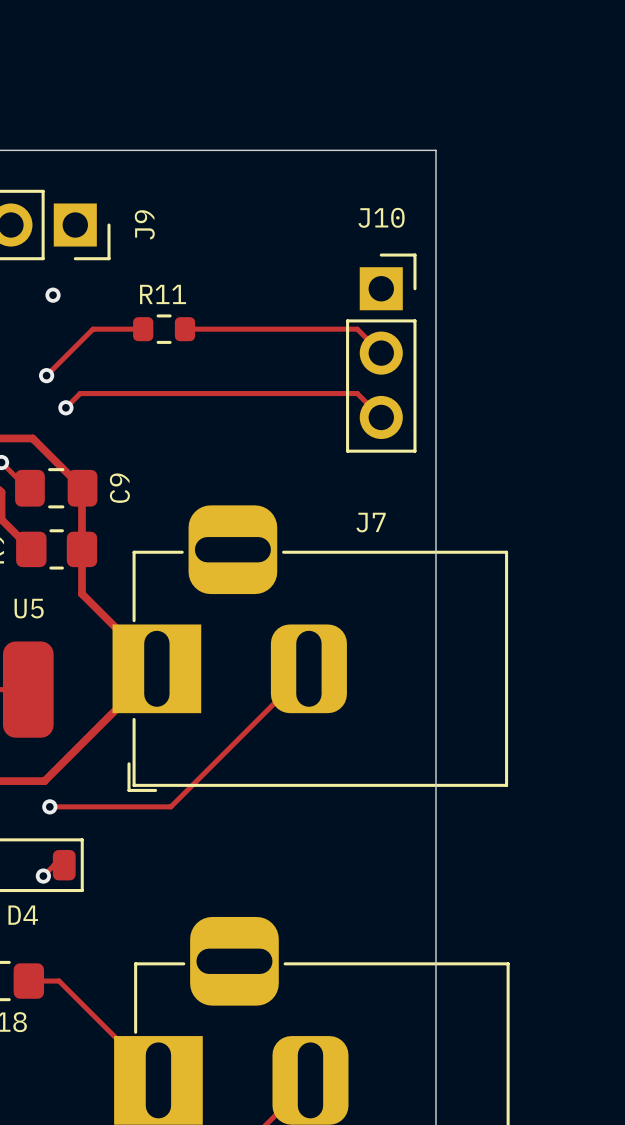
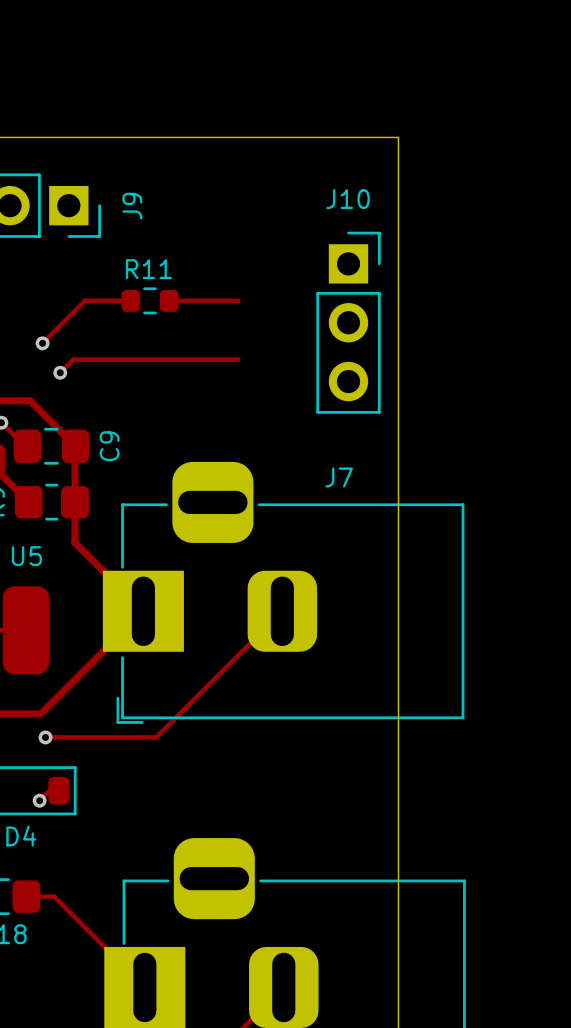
via: (53, 295) -> none
track: (260, 329) (357, 329) (381, 353) -> none
track: (260, 393) (357, 393) (381, 417) -> none

